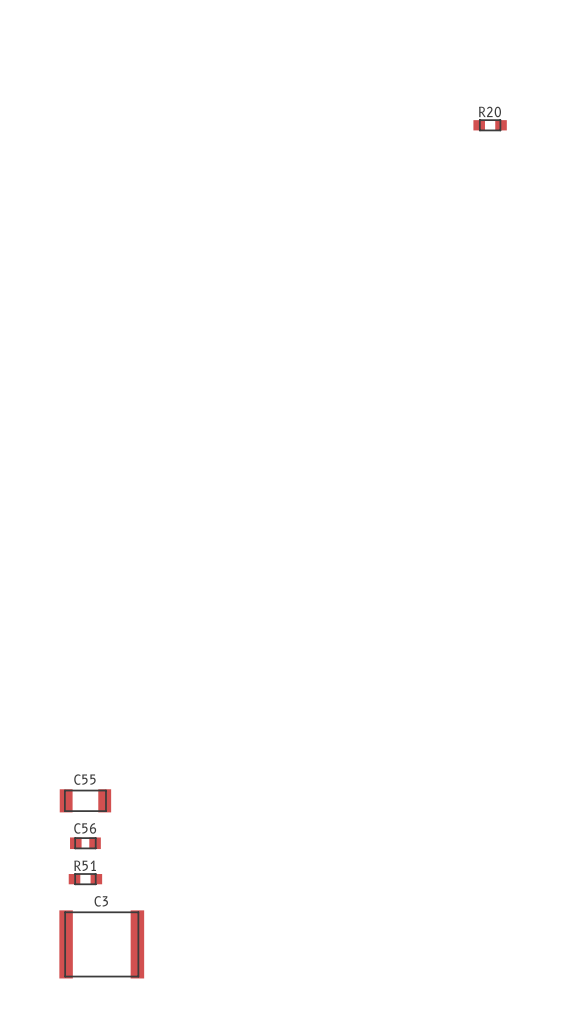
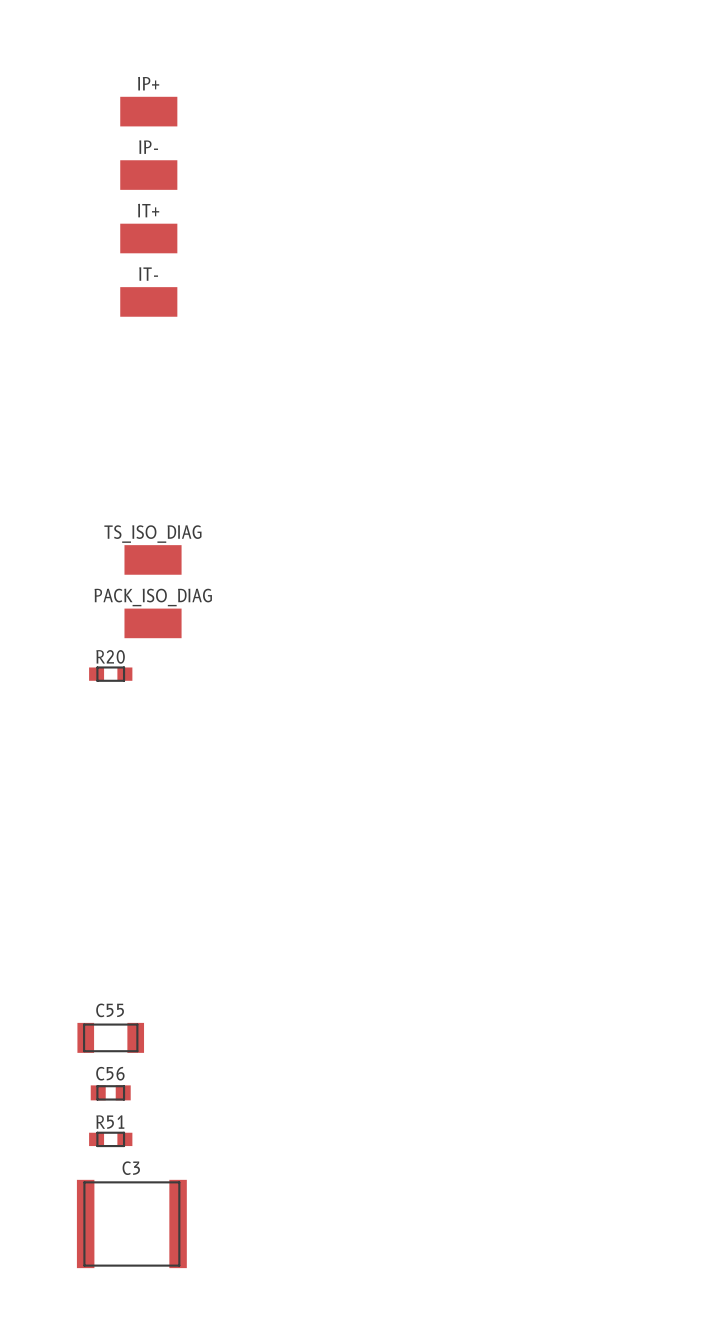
IP+: none -> (148, 111)
R20 position: (490, 125) -> (110, 674)
IP-: none -> (148, 175)
IT+: none -> (148, 238)
IT-: none -> (148, 301)
TS_ISO_DIAG: none -> (153, 559)
PACK_ISO_DIAG: none -> (153, 623)

